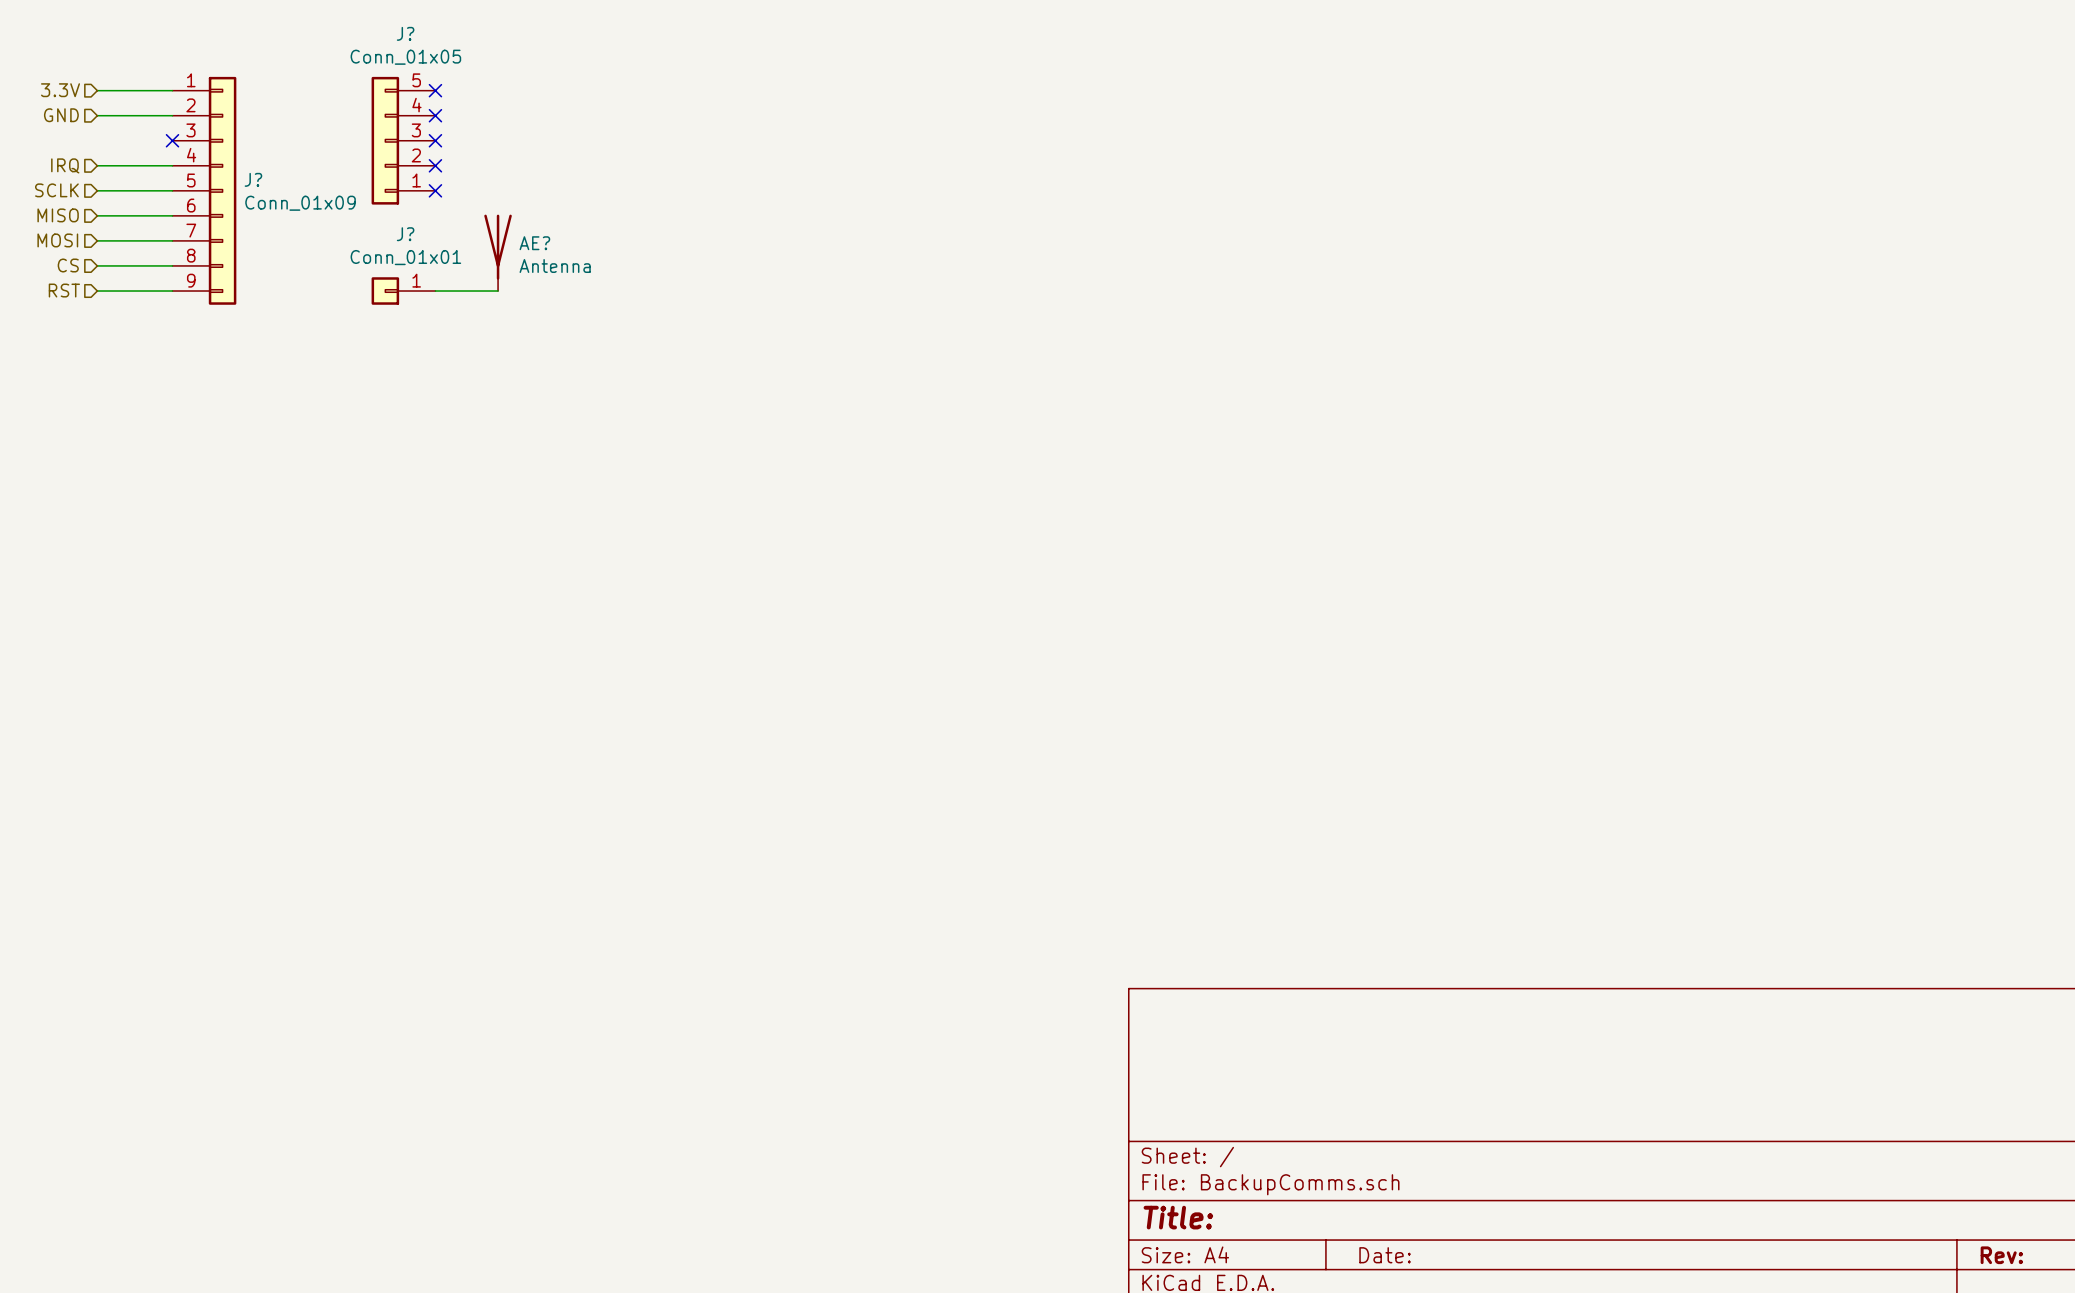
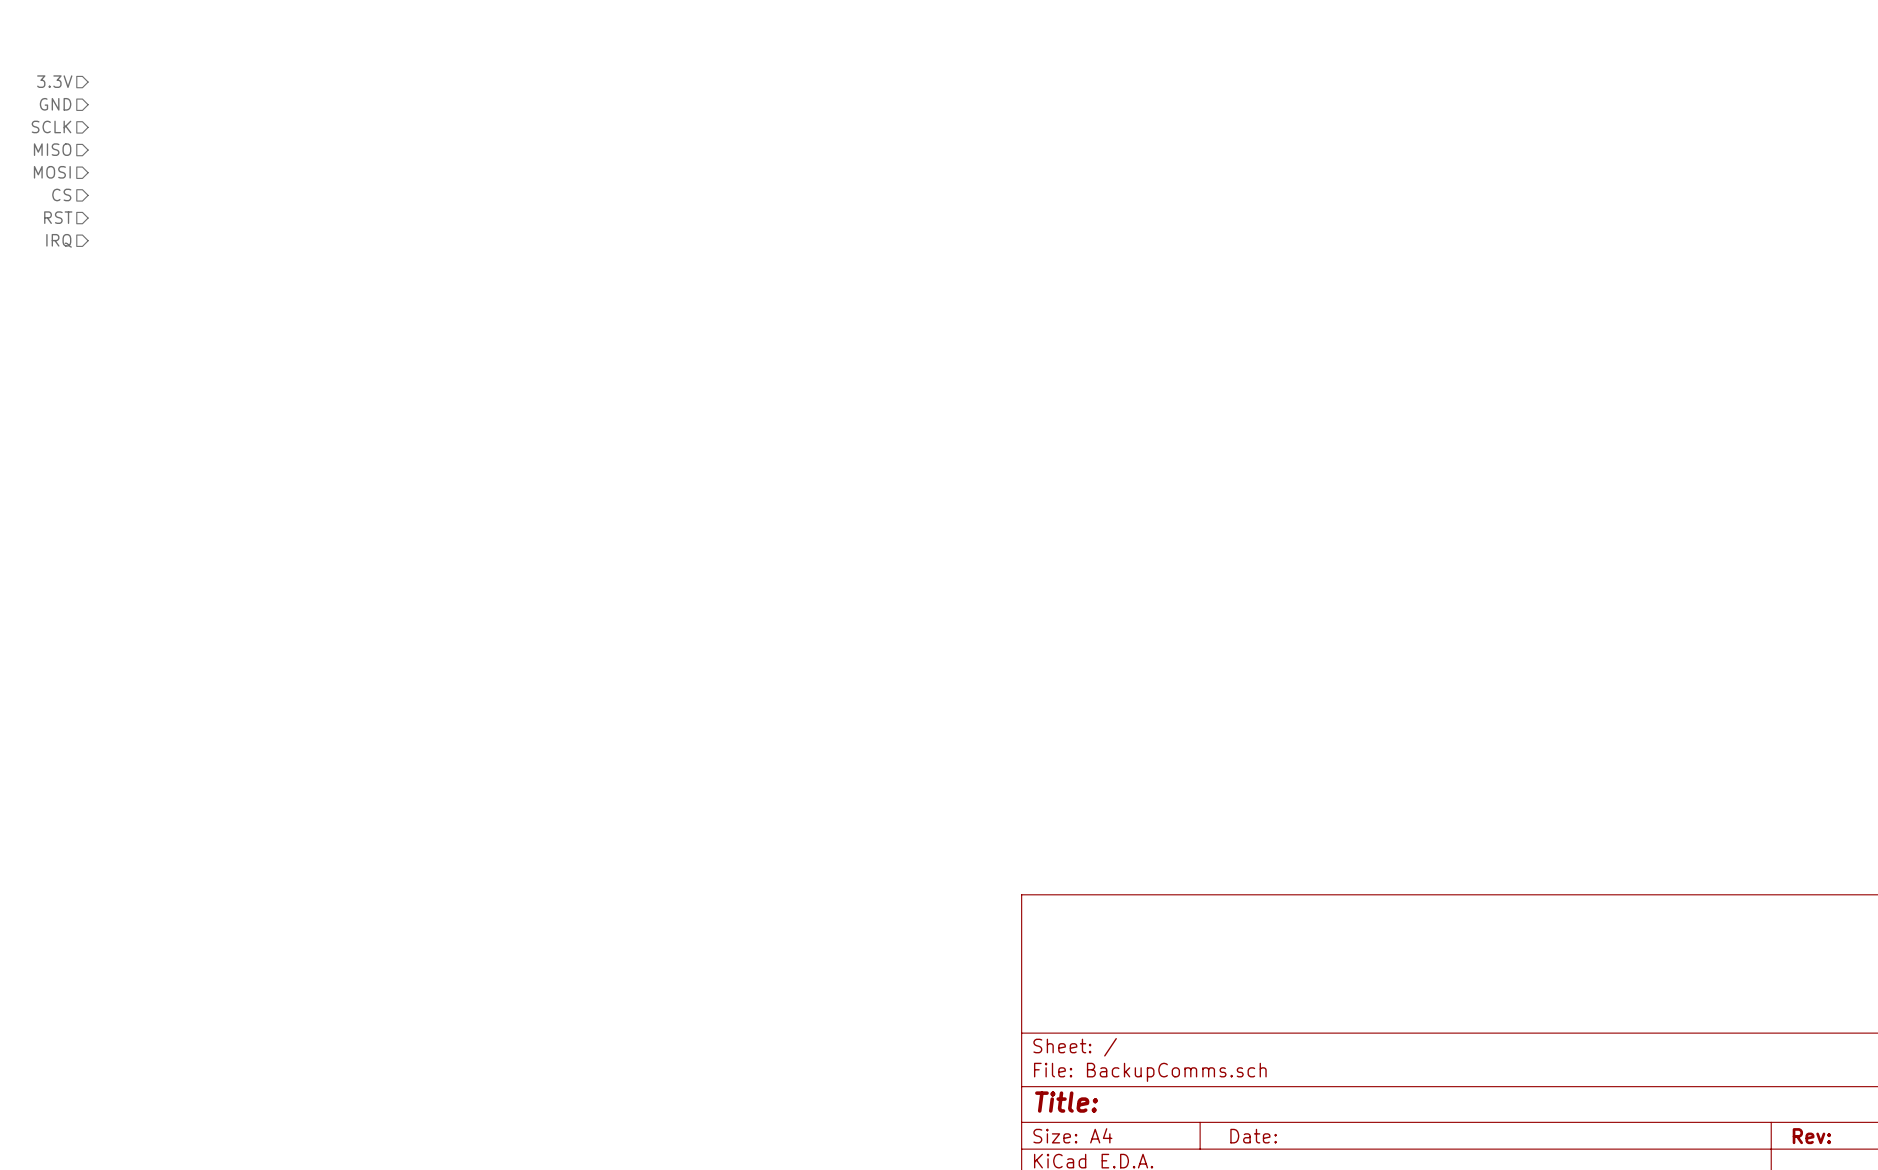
wire: (97, 90) (172, 90) -> none
no-connect mark: (435, 90) -> none
wire: (97, 115) (172, 115) -> none
no-connect mark: (435, 115) -> none
hierarchical label: none -> SCLK (51, 126)
no-connect mark: (172, 140) -> none
J?: Conn_01x05 (403, 140) -> none
no-connect mark: (435, 140) -> none
hierarchical label: IRQ (65, 165) -> MISO (52, 149)
wire: (97, 165) (172, 165) -> none
no-connect mark: (435, 165) -> none
hierarchical label: SCLK (56, 190) -> MOSI (52, 172)
wire: (97, 190) (172, 190) -> none
J?: Conn_01x09 (204, 190) -> none
no-connect mark: (435, 190) -> none
hierarchical label: MISO (58, 215) -> CS (61, 194)
wire: (97, 215) (172, 215) -> none
hierarchical label: MOSI (57, 240) -> RST (58, 217)
wire: (97, 240) (172, 240) -> none
AE?: Antenna (498, 252) -> none
hierarchical label: CS (68, 265) -> IRQ (59, 240)
wire: (97, 265) (172, 265) -> none
hierarchical label: RST (64, 290) -> none
wire: (97, 291) (172, 291) -> none
J?: Conn_01x01 (403, 291) -> none
wire: (435, 291) (498, 291) -> none

